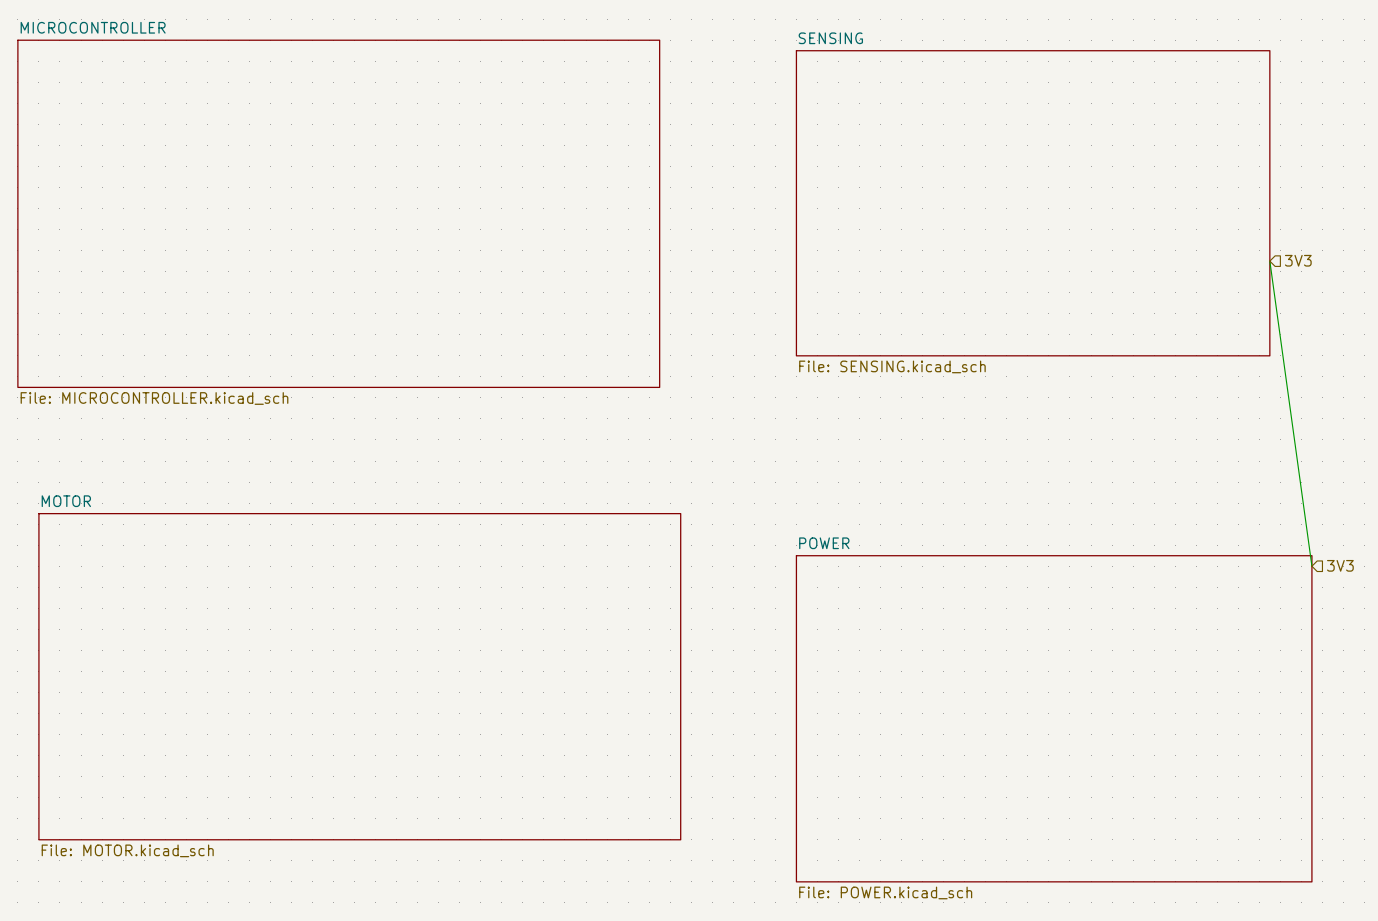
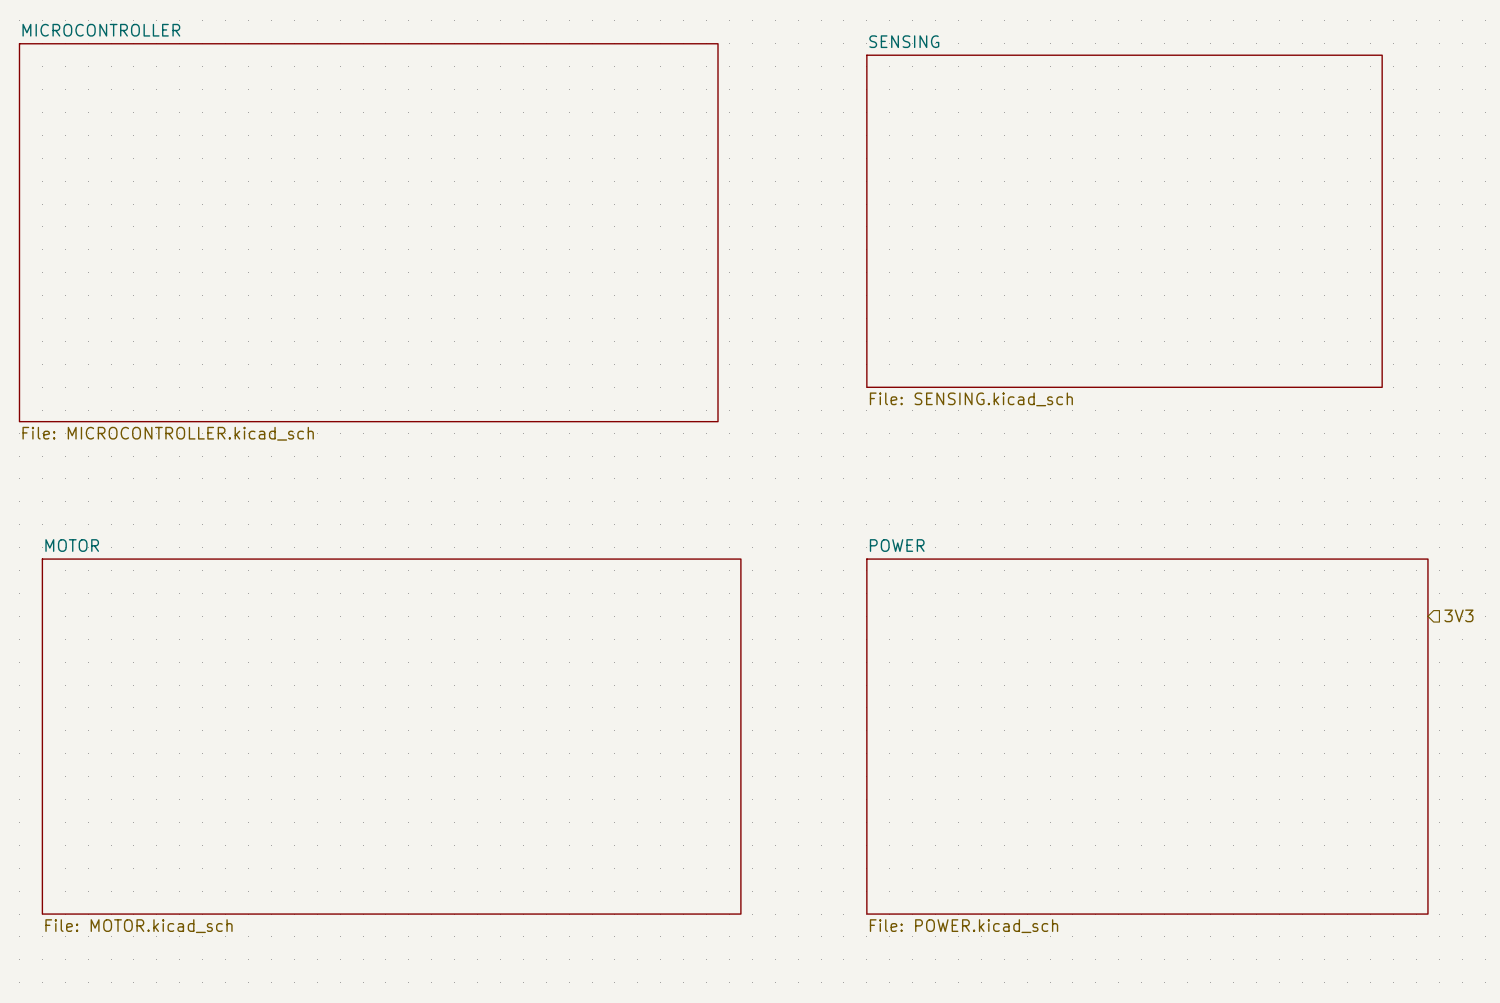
hierarchical label: 3V3 (1298, 260) -> none
wire: (1269, 261) (1311, 566) -> none
sheet POWER position: (1054, 718) -> (1147, 736)

